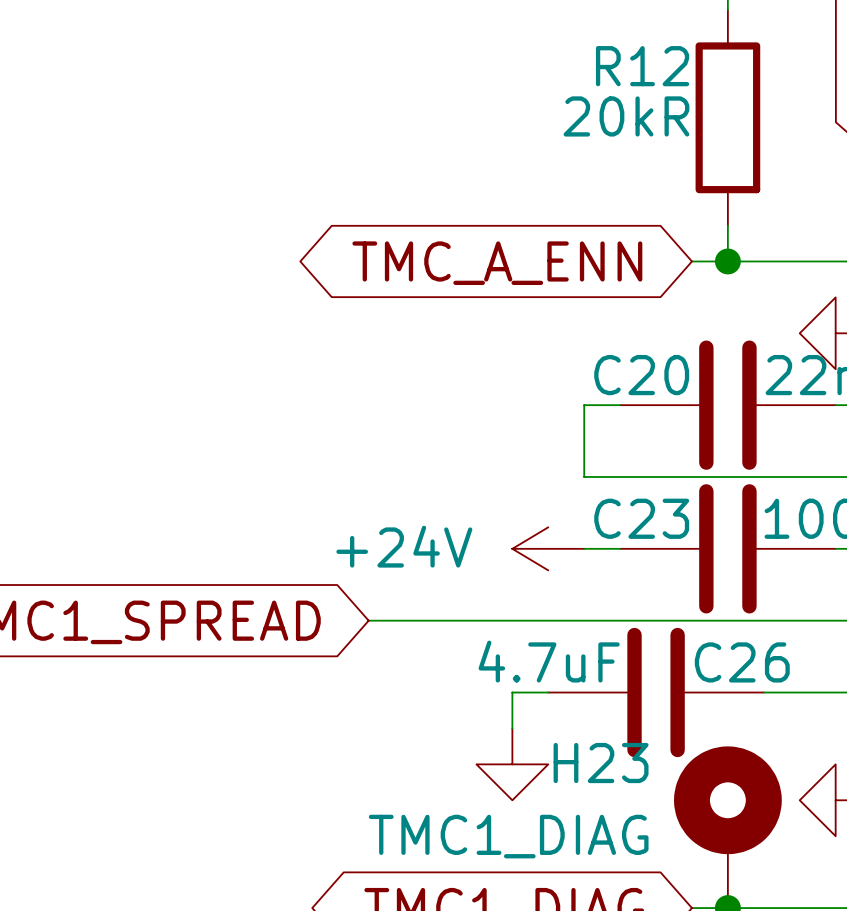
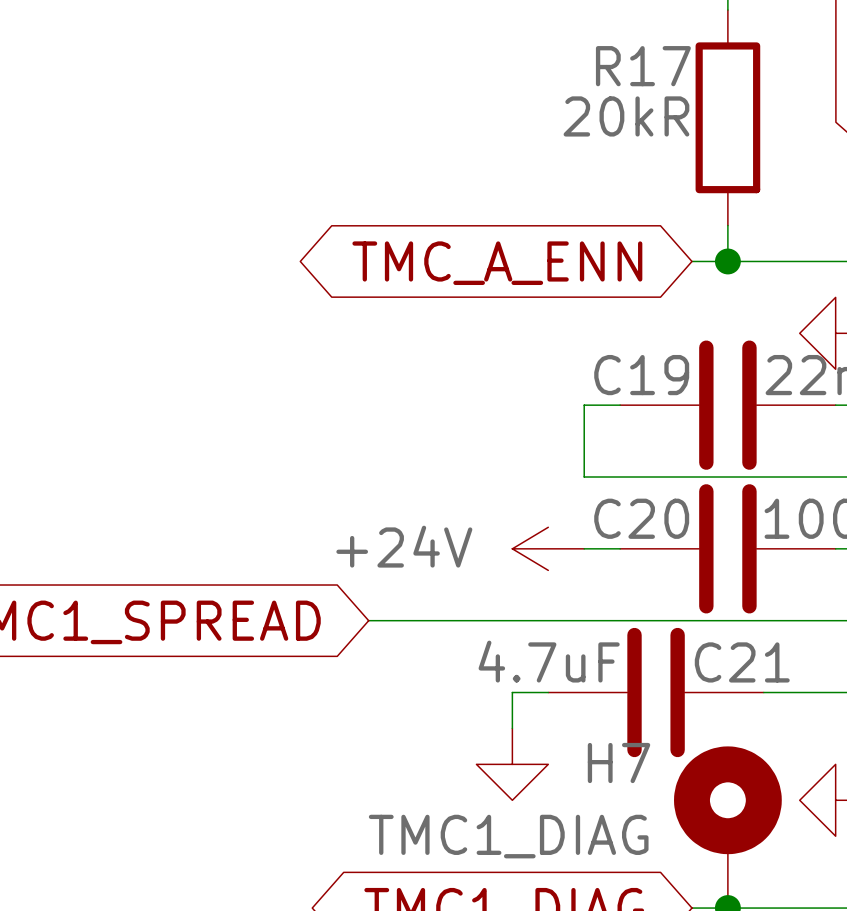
R12 name: R12 (642, 66) -> R17 (643, 66)
C20 name: C20 (641, 375) -> C19 (641, 375)
C23 name: C23 (641, 518) -> C20 (641, 518)
C26 name: C26 (742, 662) -> C21 (742, 662)
H23 name: H23 (601, 763) -> H7 (619, 763)

